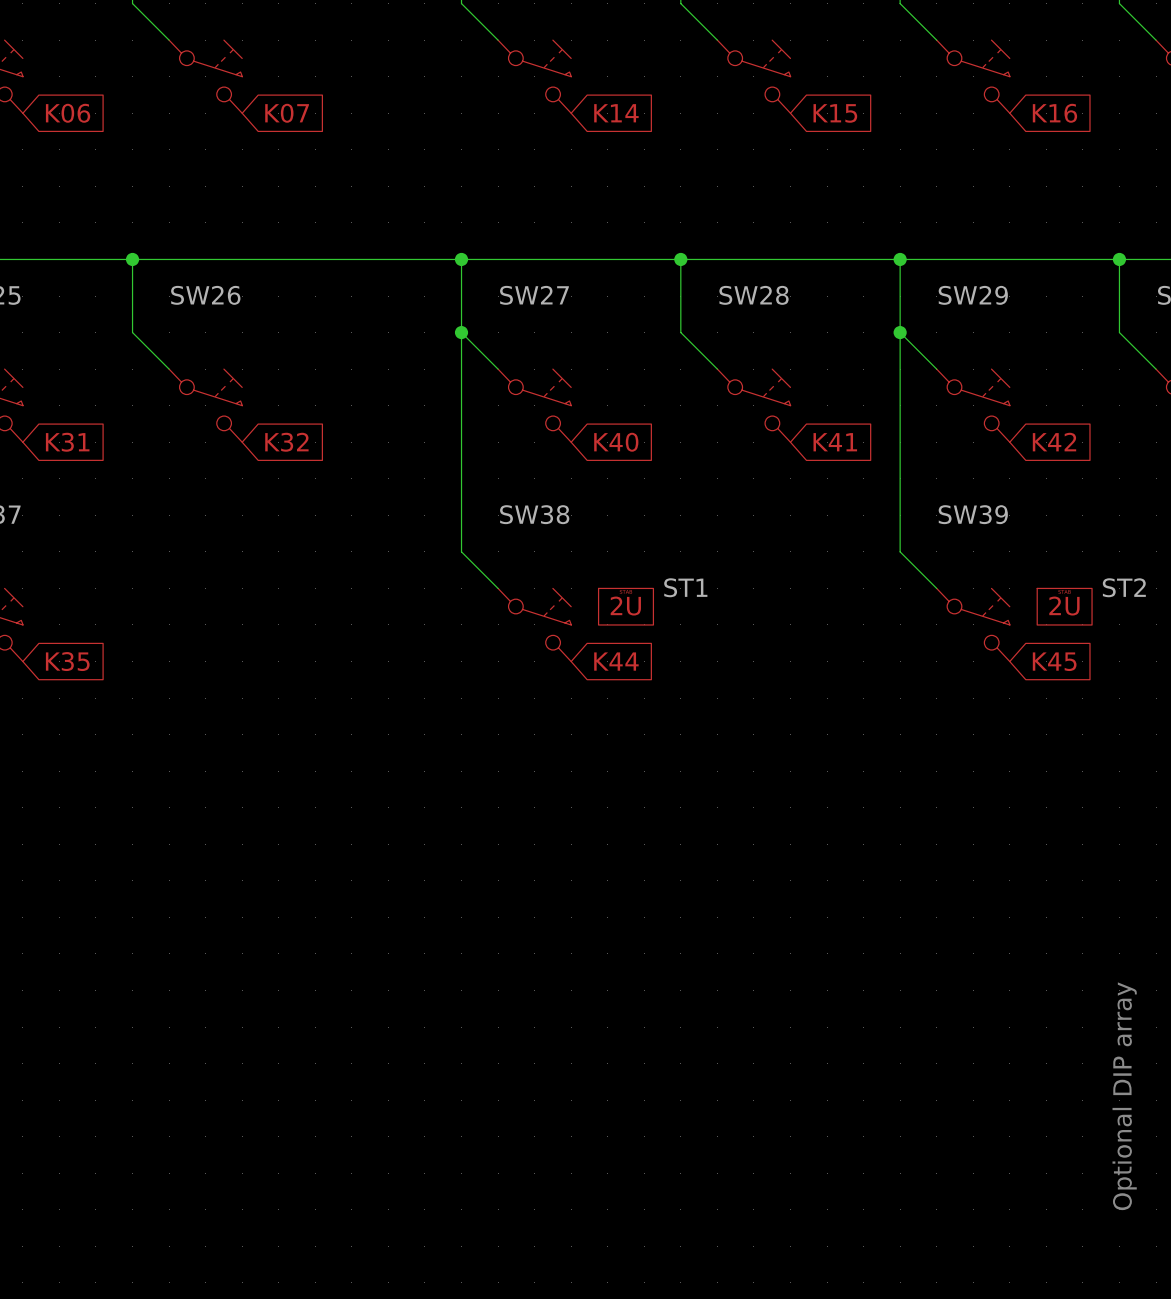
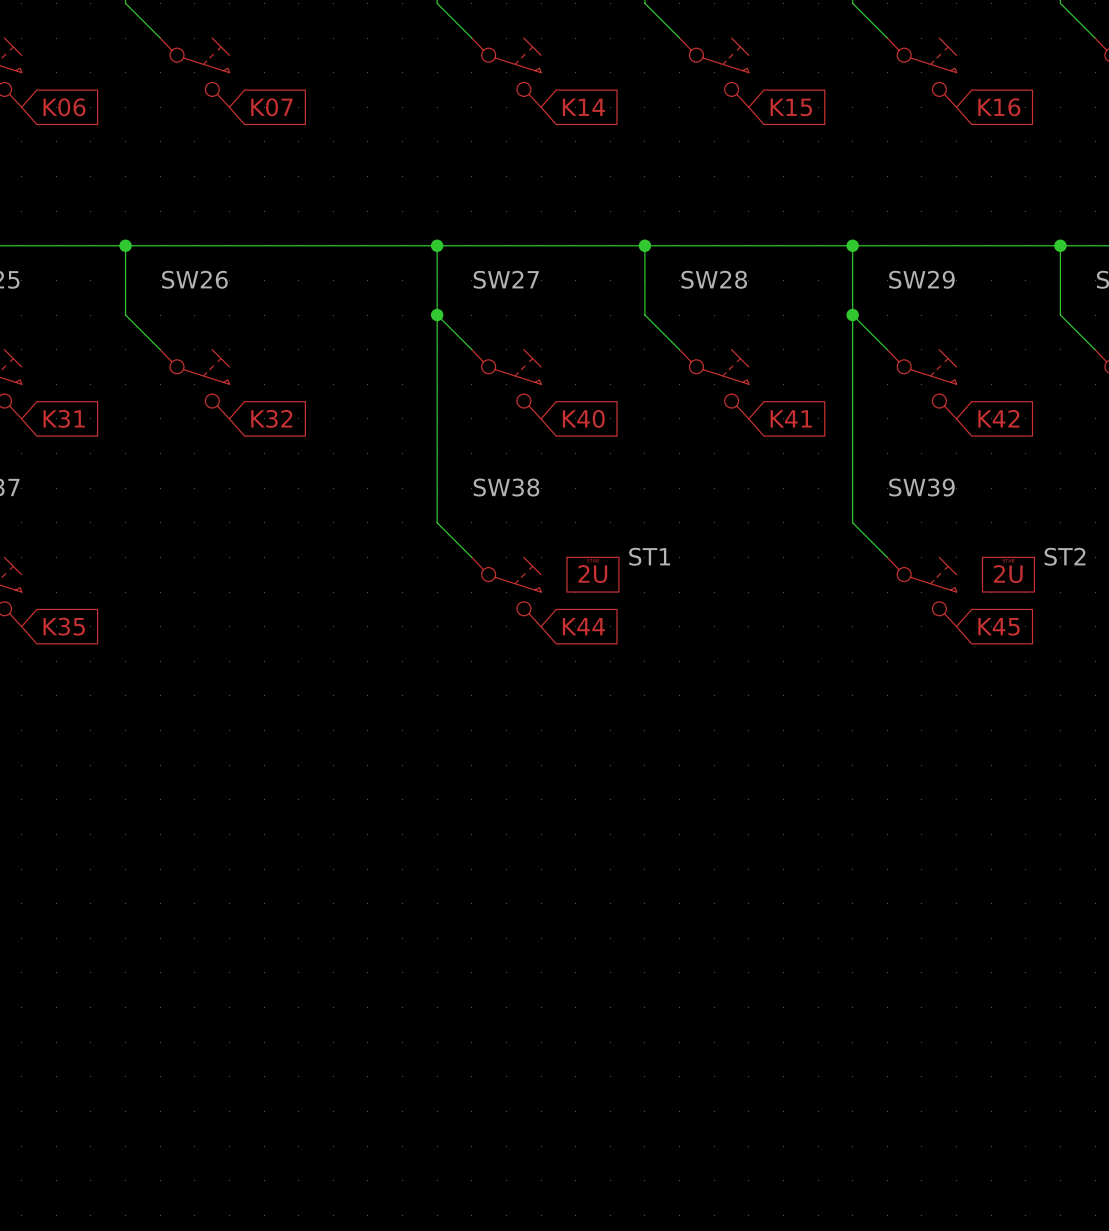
text: Optional DIP array (1124, 1096) -> none

